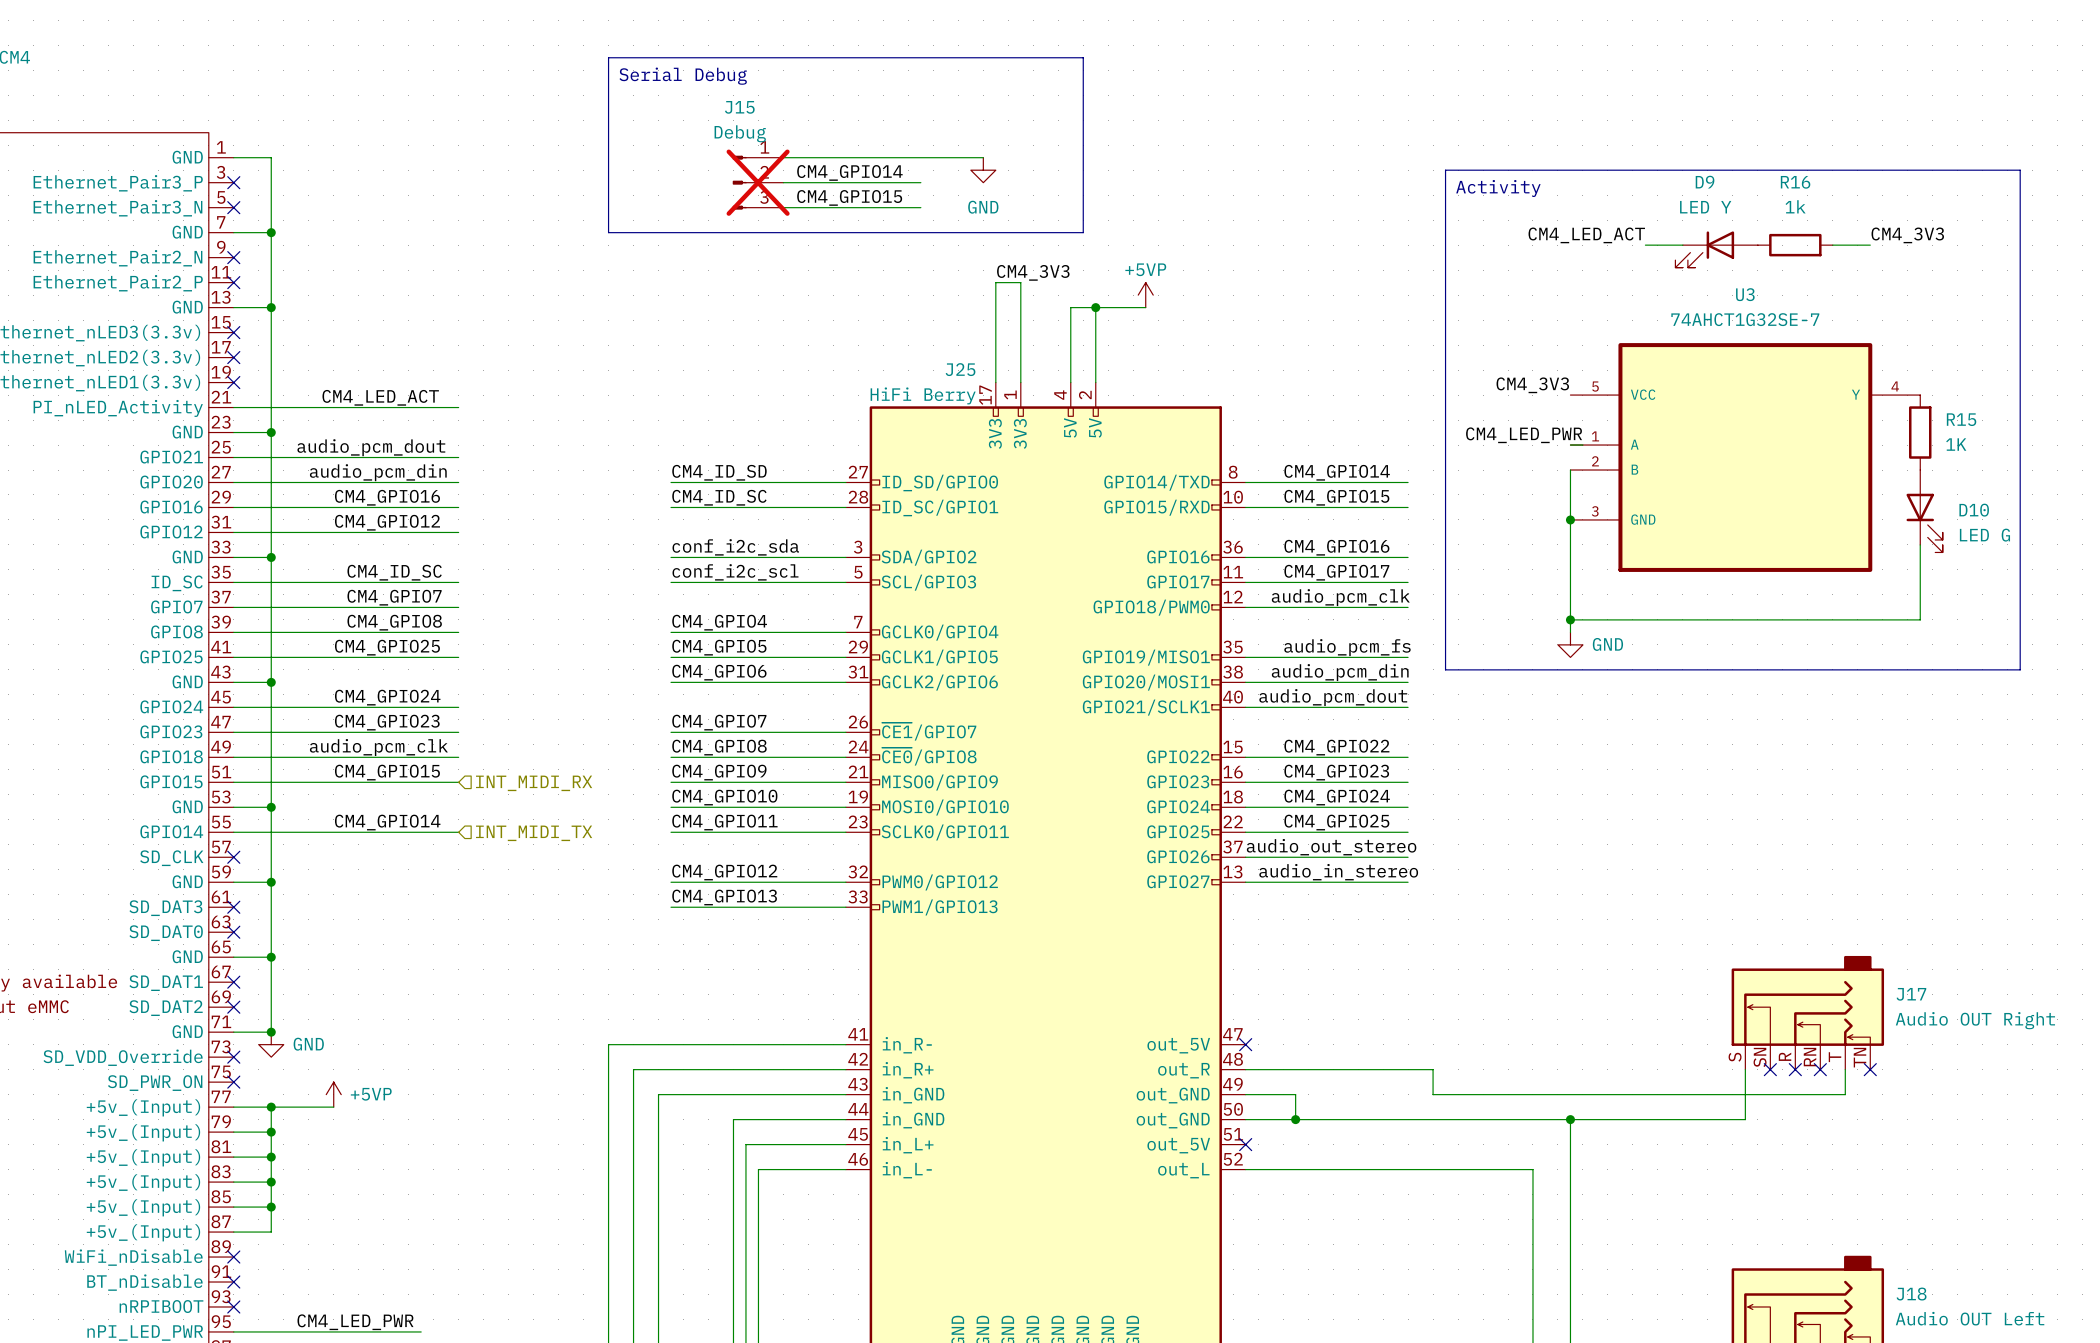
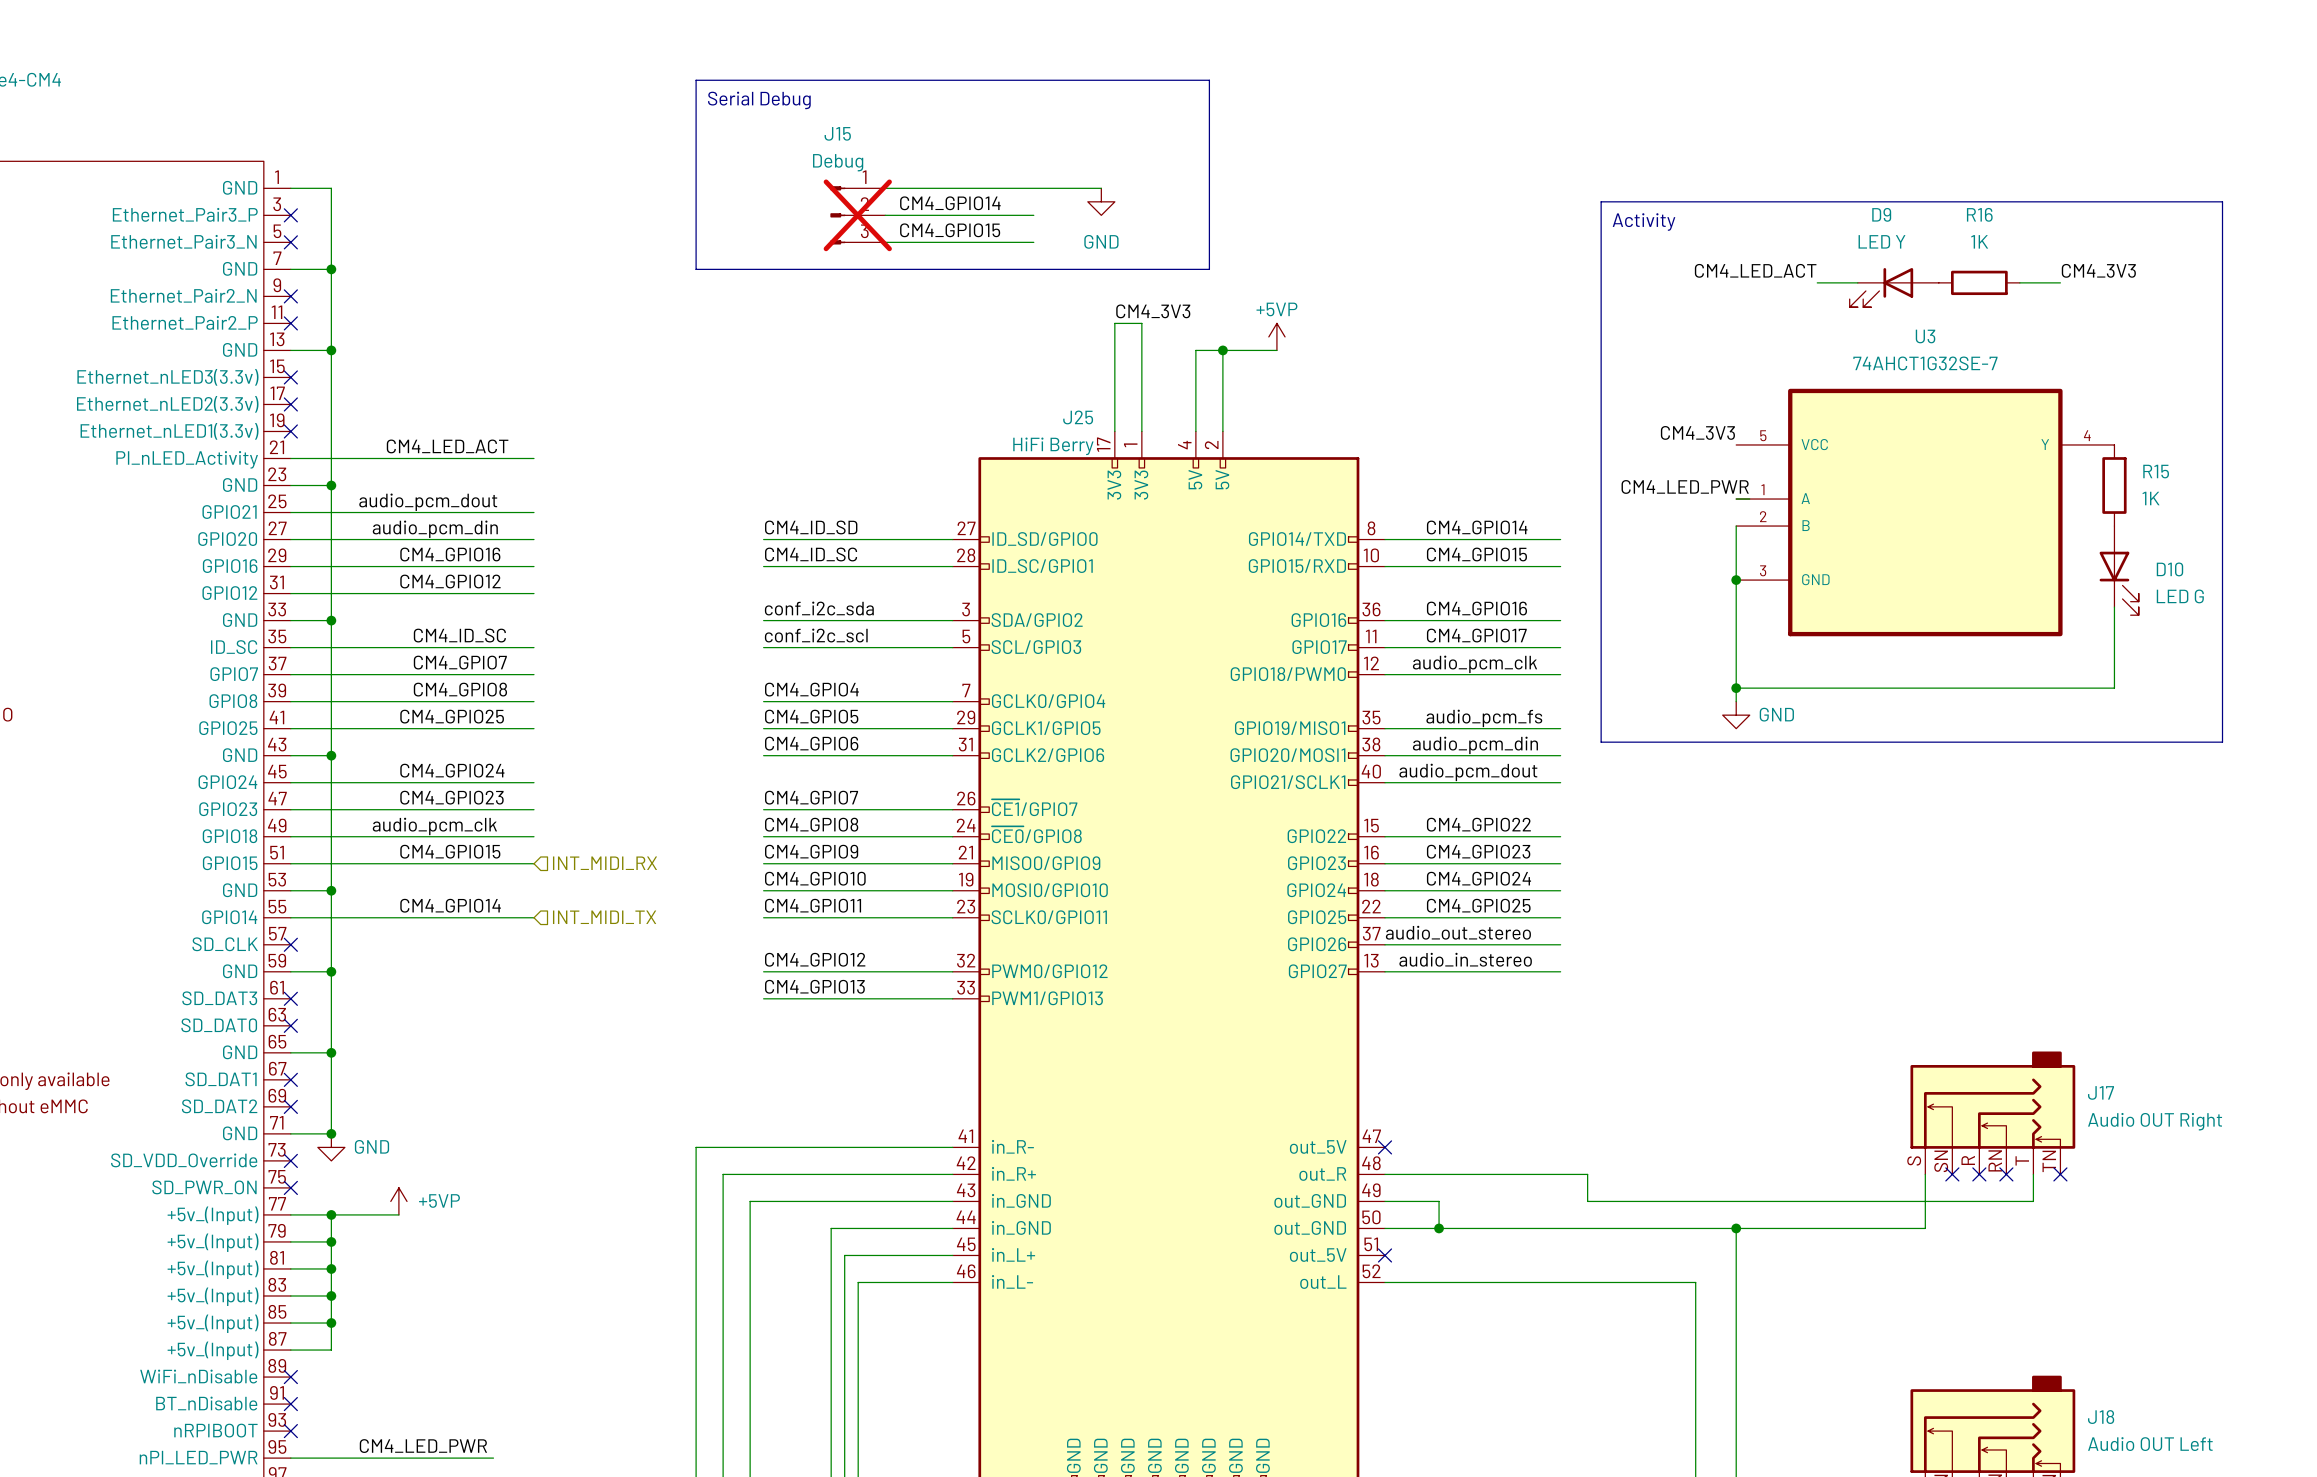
R16 value: 1k (1795, 206) -> 1K (1979, 241)

